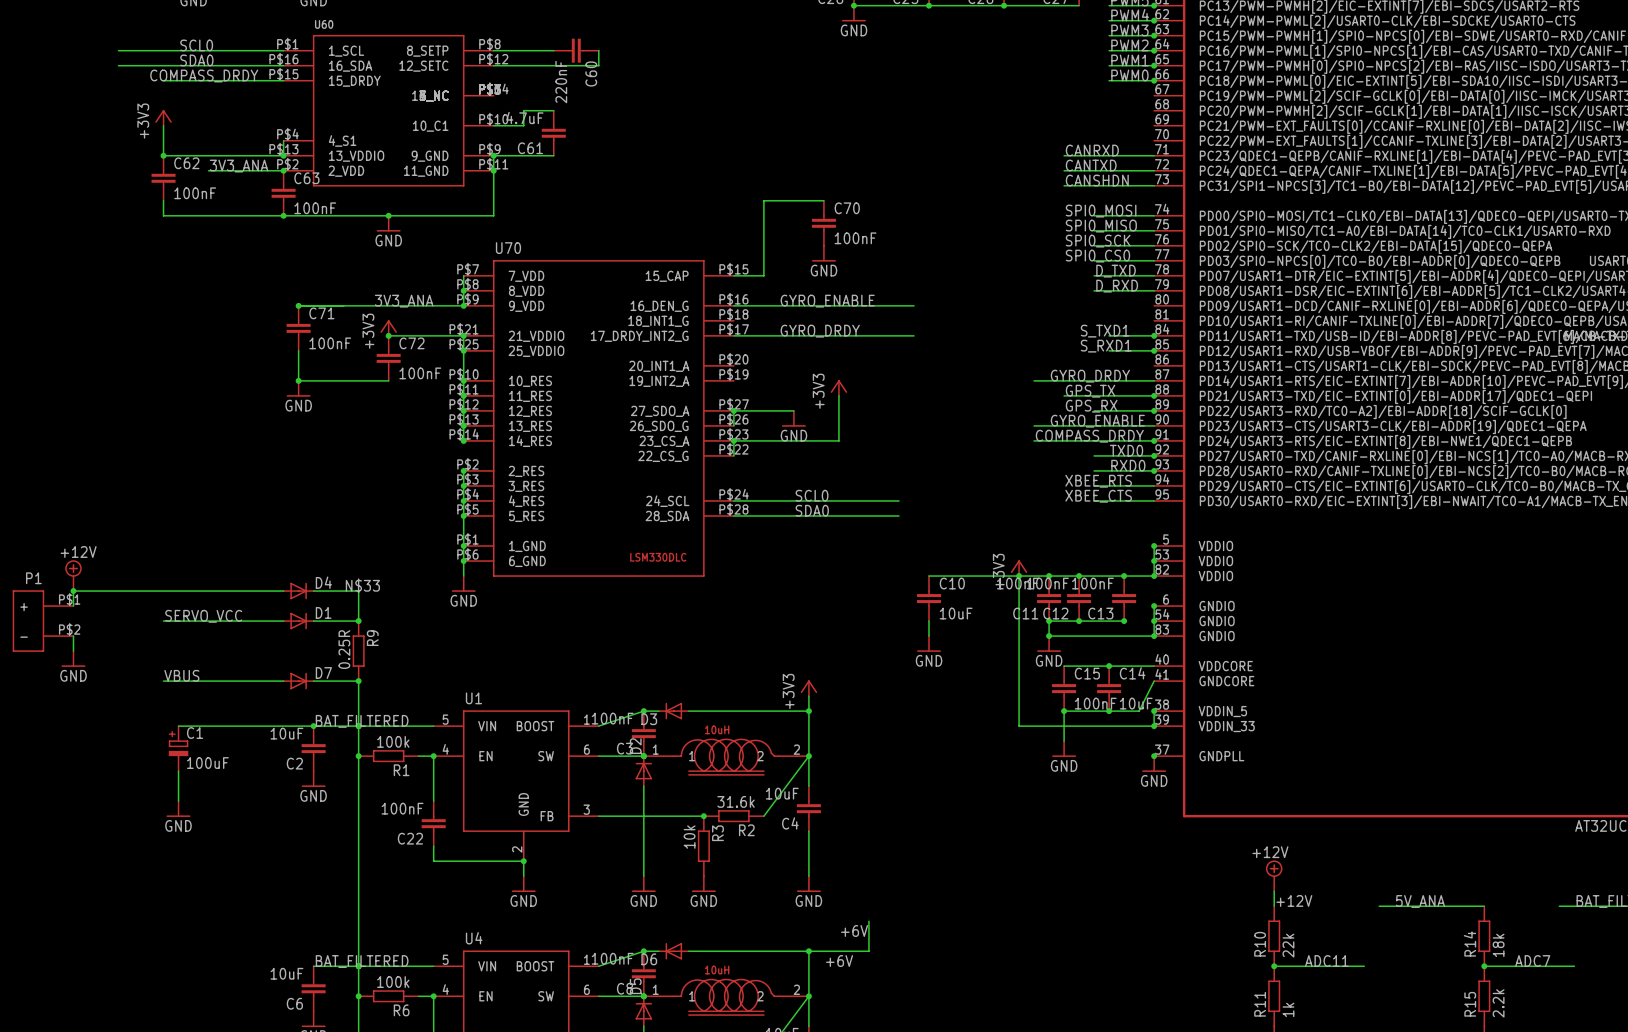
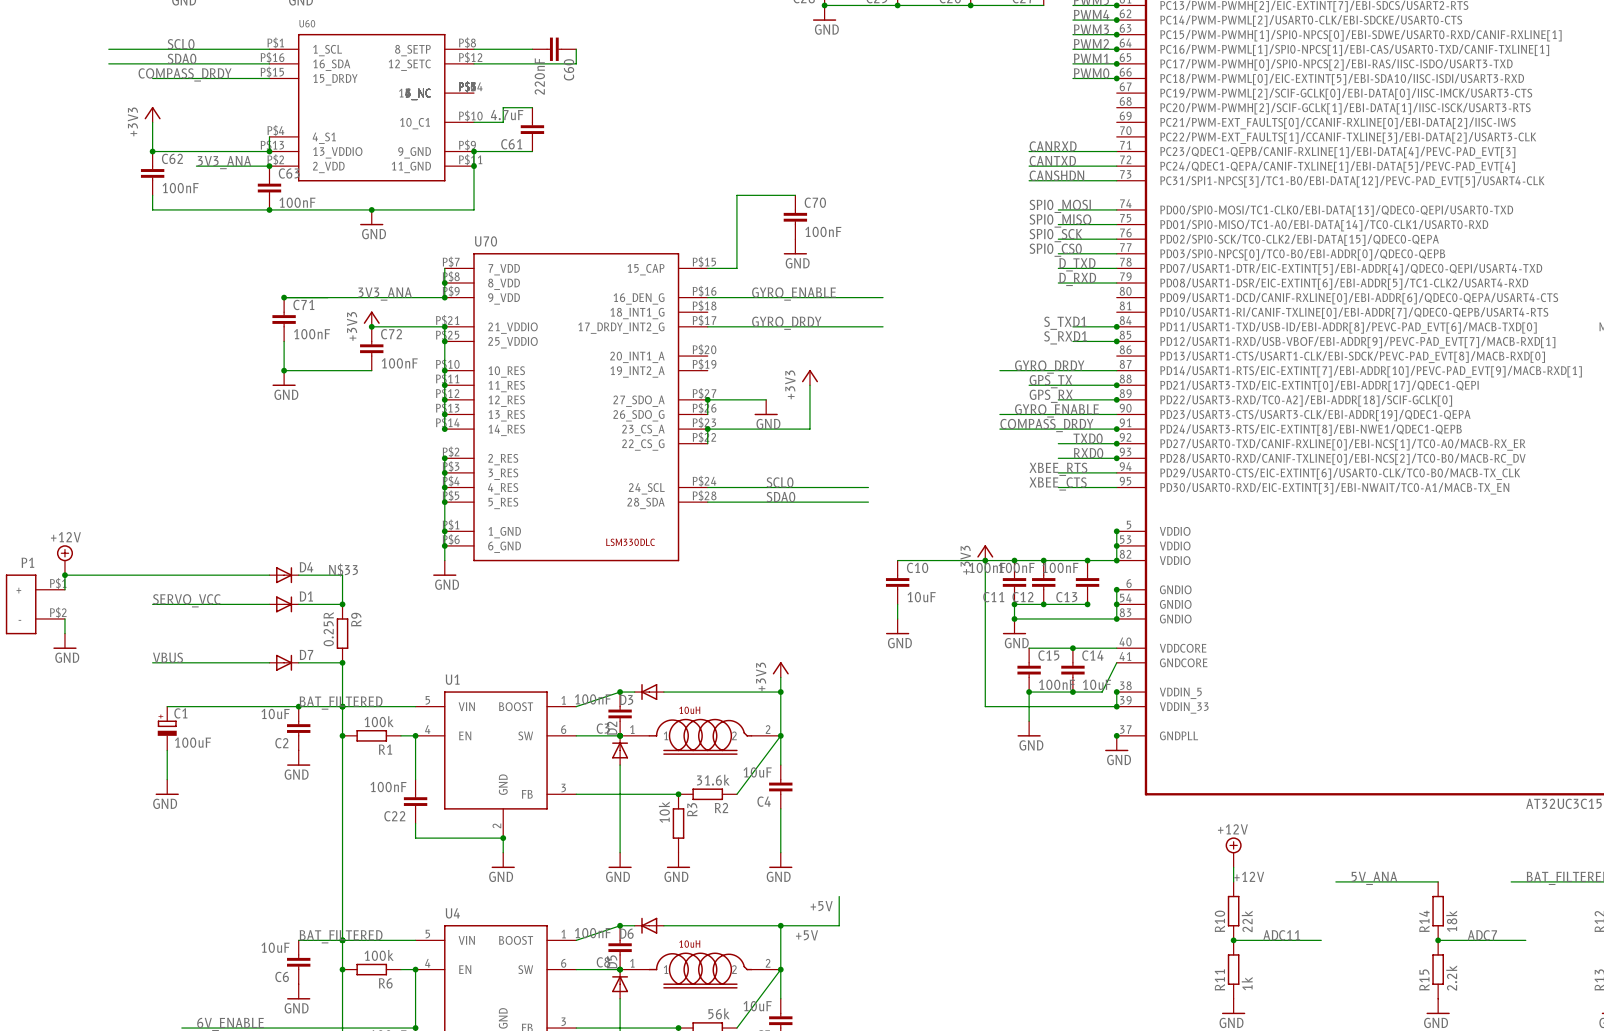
label: +6V (854, 930) -> +5V (821, 906)
label: +6V (839, 961) -> +5V (807, 935)

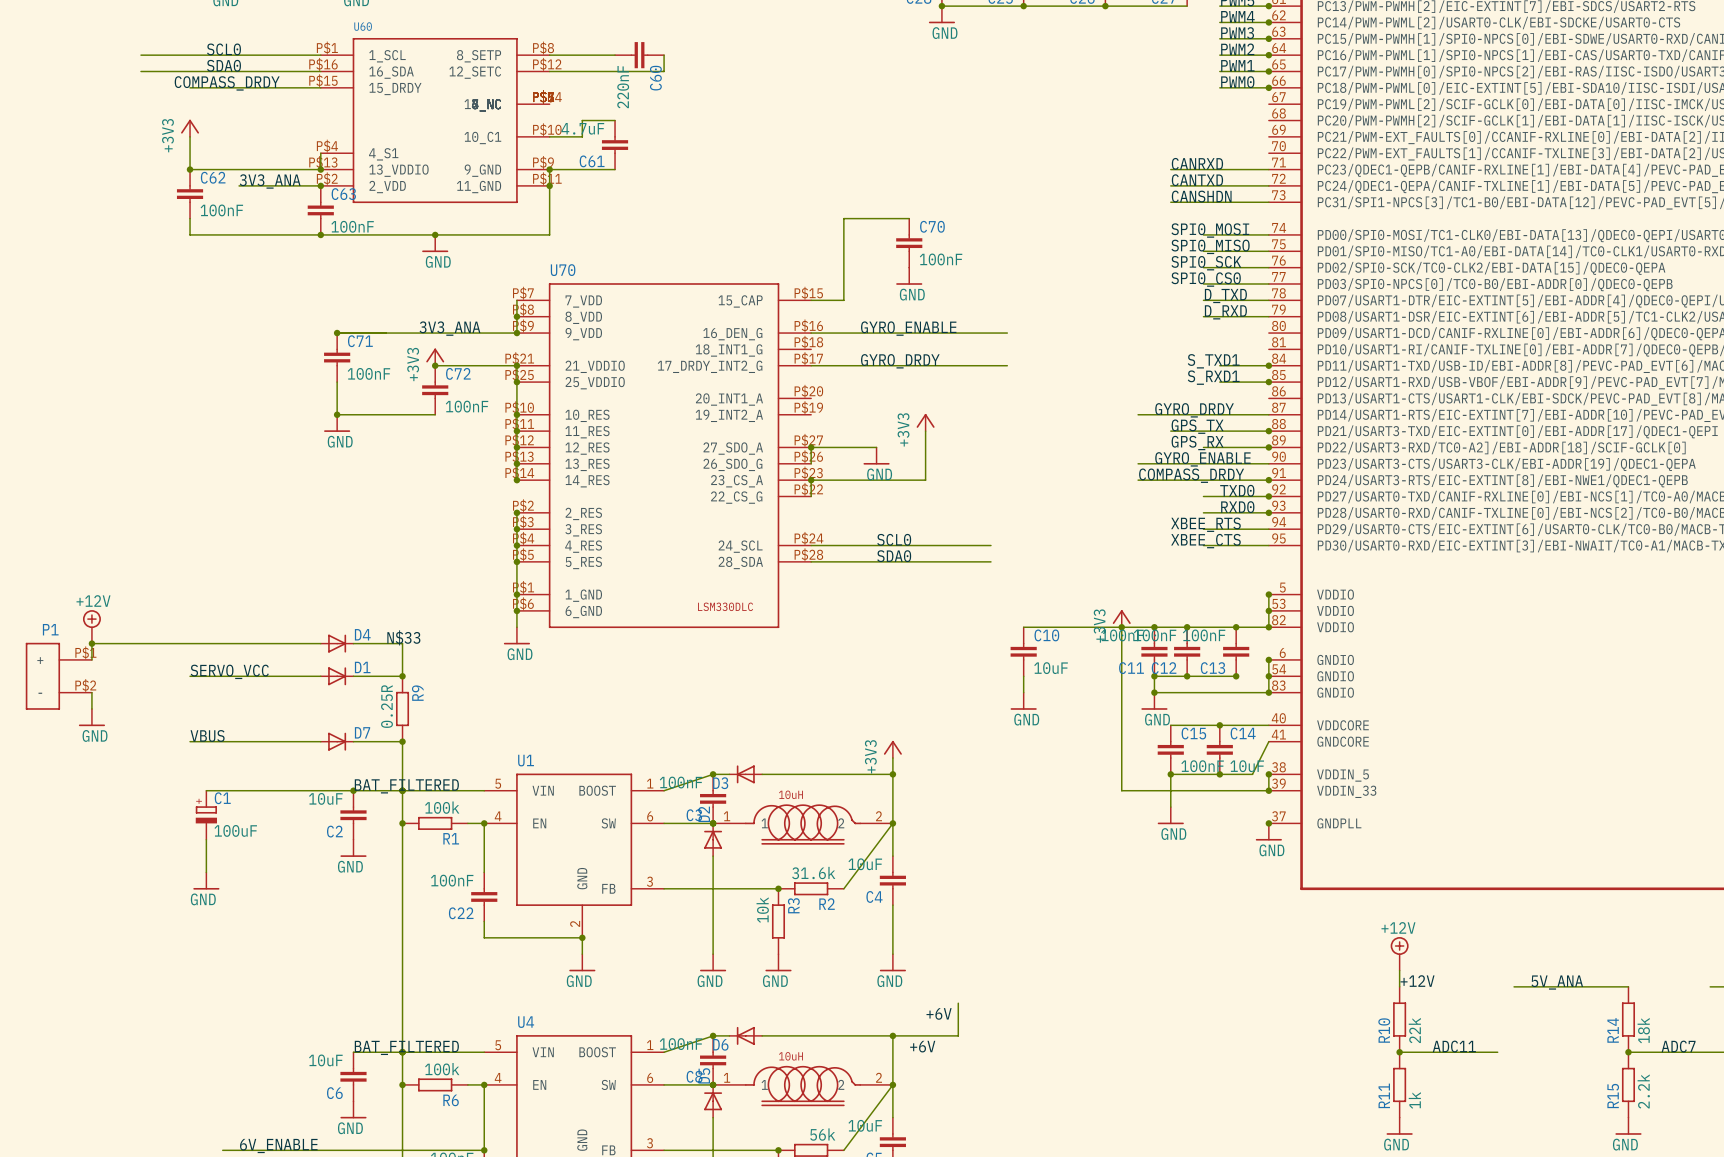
label: +5V (821, 906) -> +6V (939, 1013)
label: +5V (807, 935) -> +6V (922, 1046)

